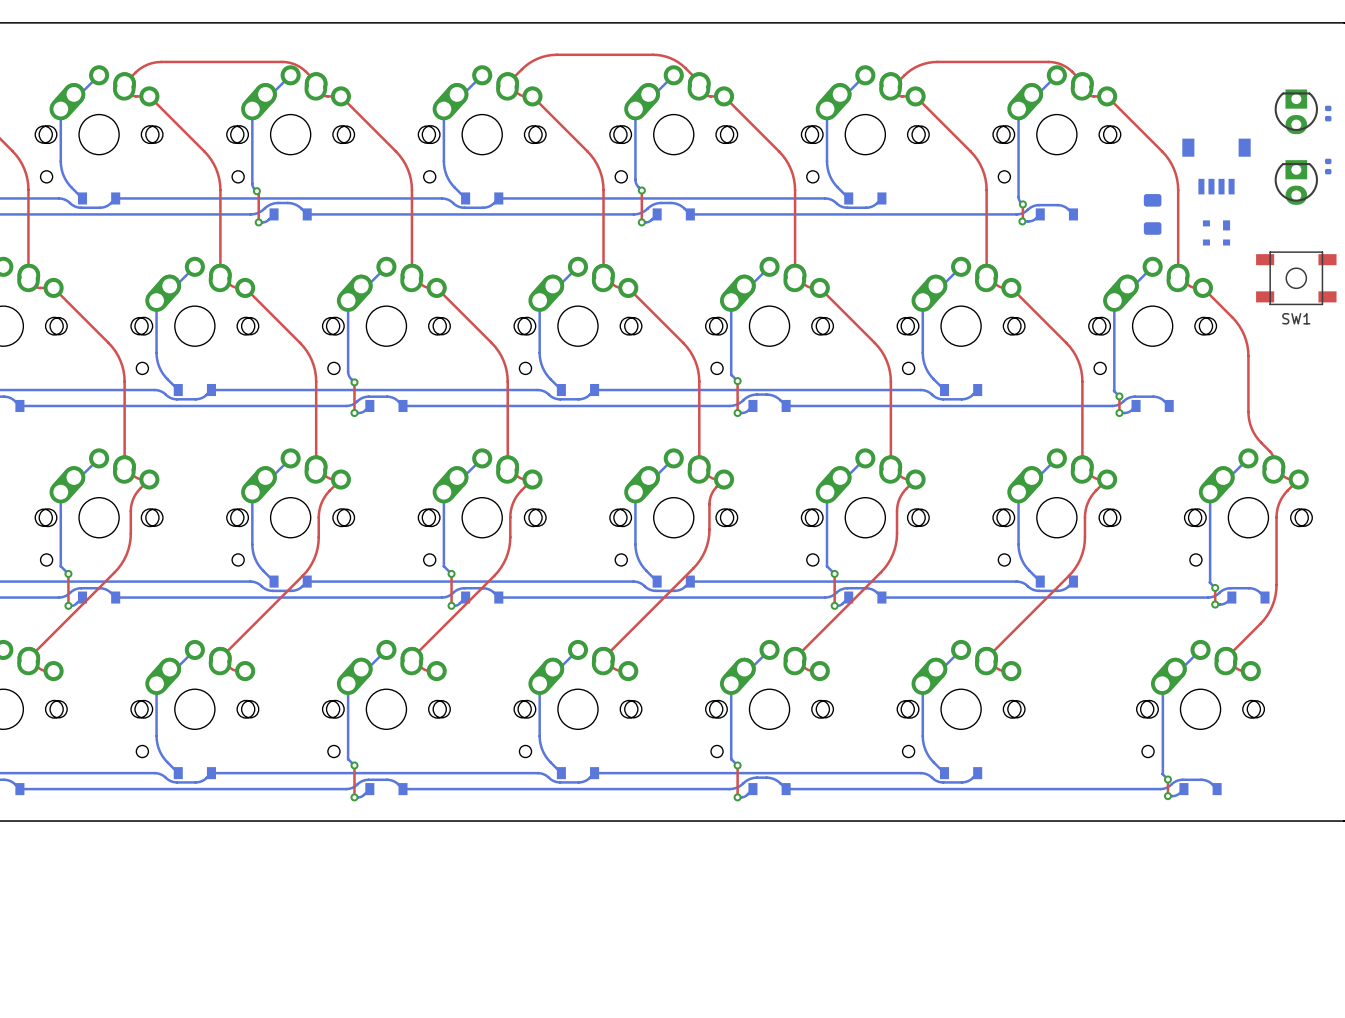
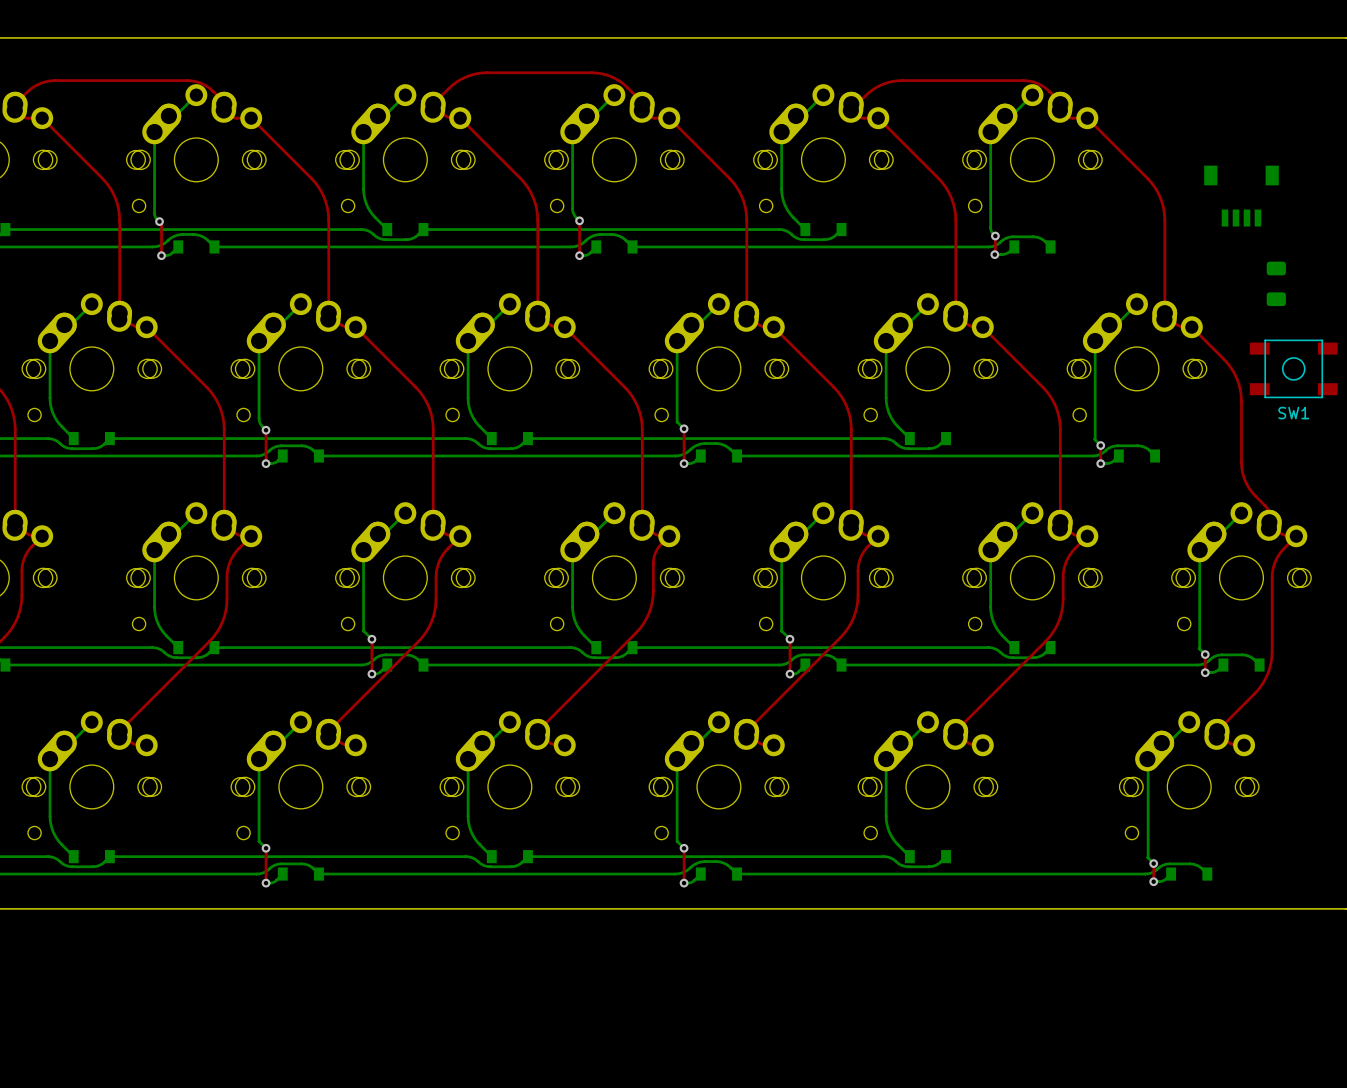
part: (1296, 111) -> none
part: (1328, 113) -> none
part position: (1216, 166) -> (1241, 196)
part: (1328, 166) -> none
part: (1296, 182) -> none
part position: (1152, 214) -> (1276, 283)
part: (1216, 232) -> none
SW1 position: (1296, 278) -> (1293, 368)

